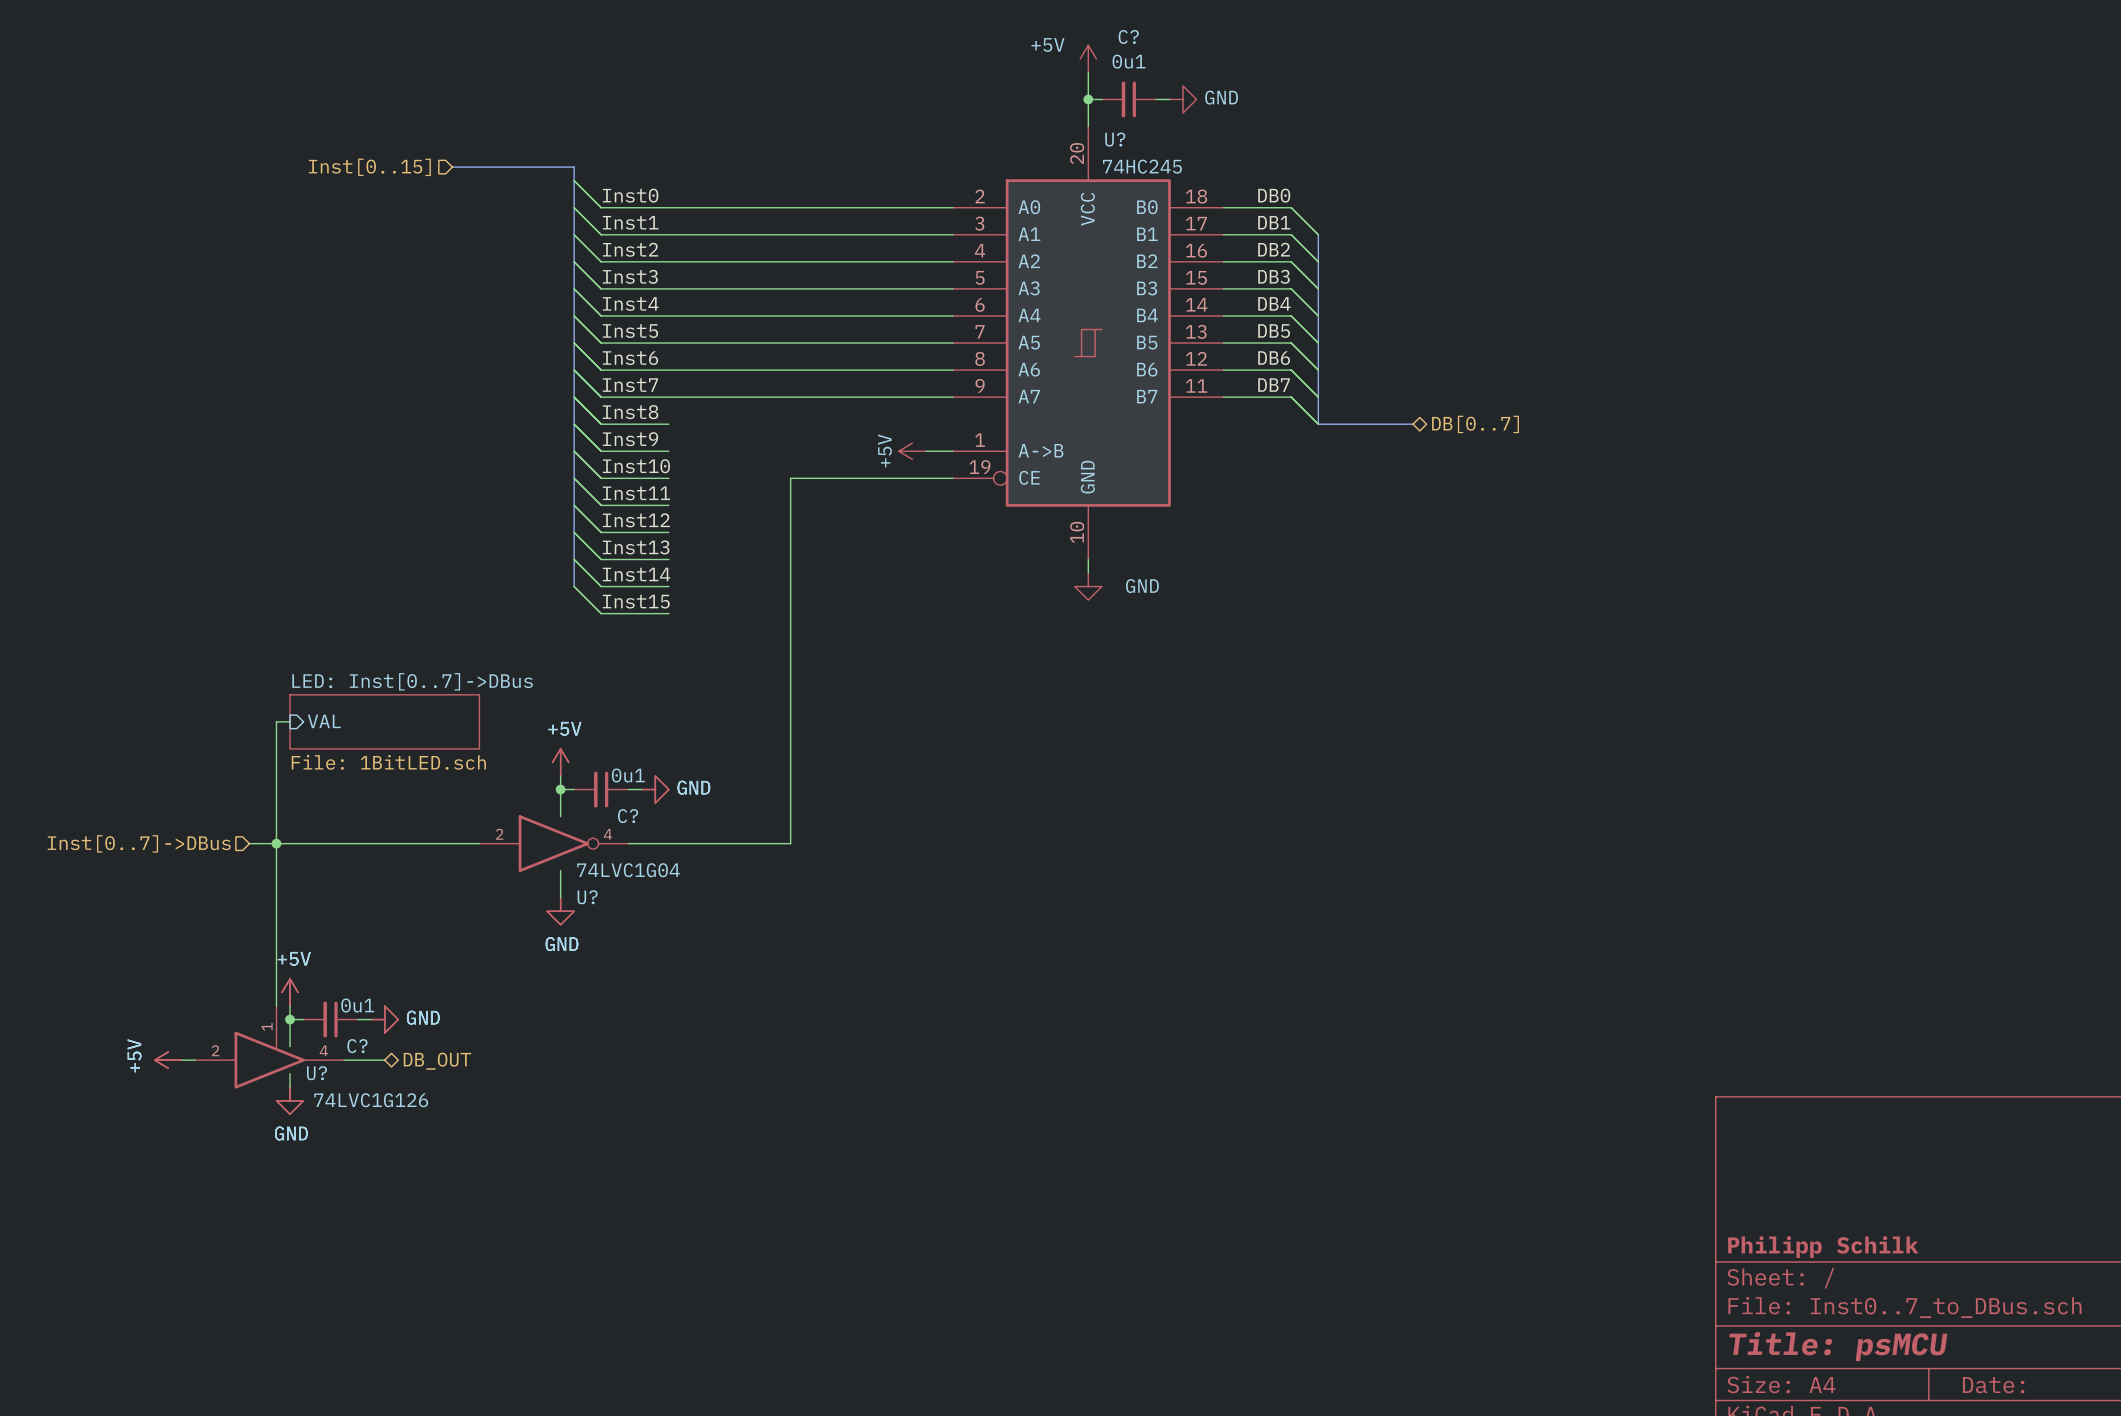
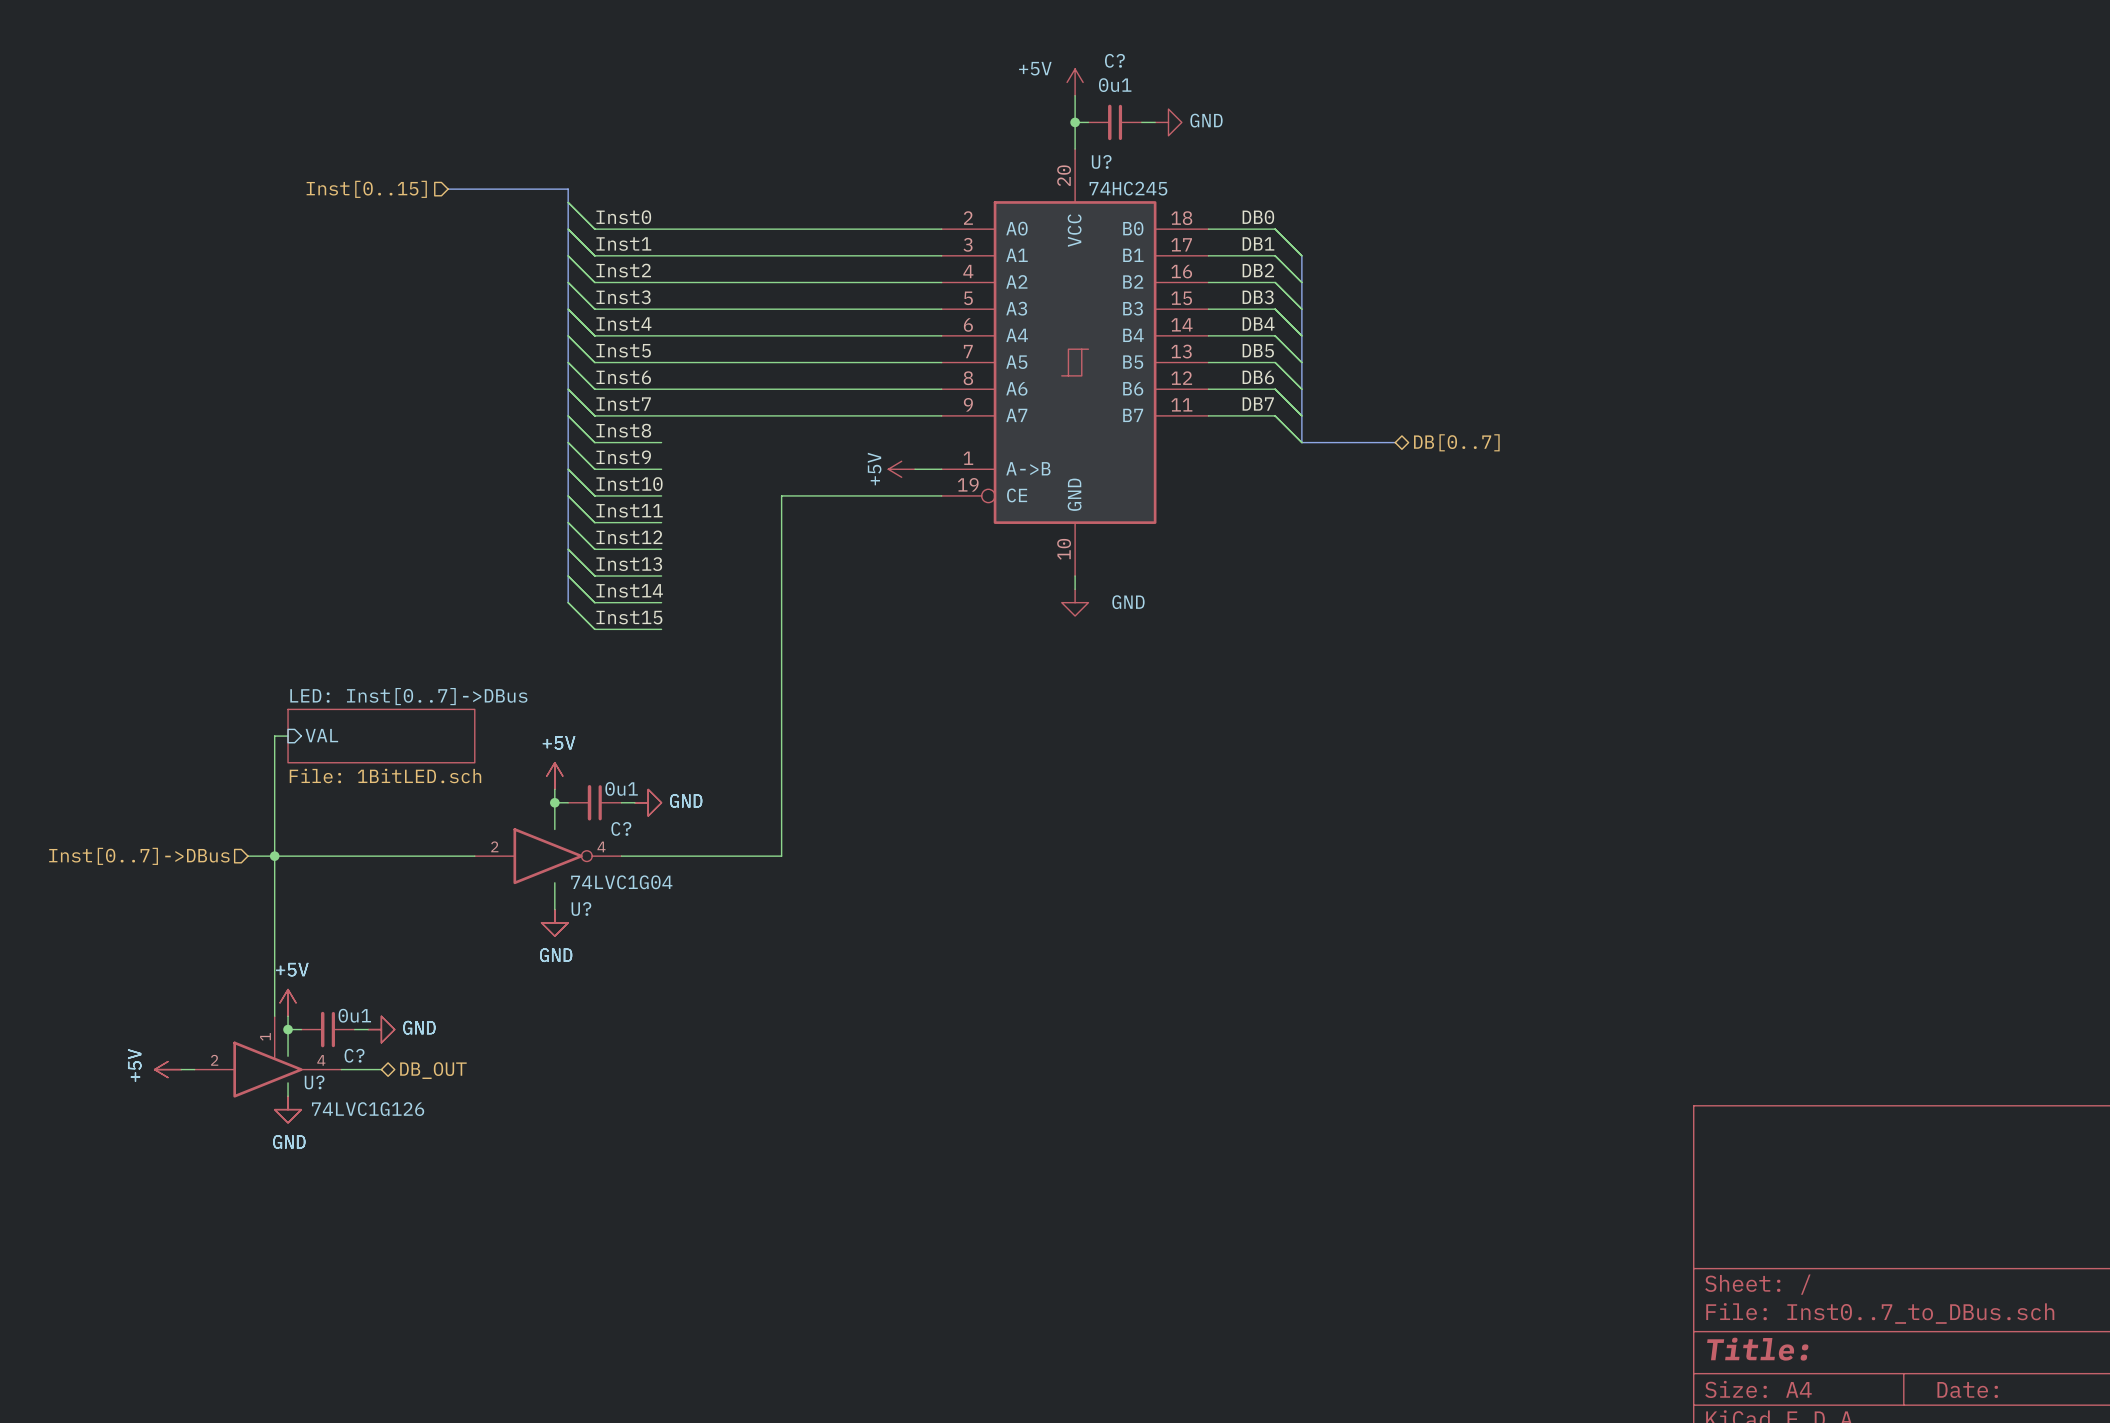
title block: Philipp Schilk (1823, 1247) -> none
title block: Title: psMCU (1838, 1346) -> Title: (1757, 1349)

